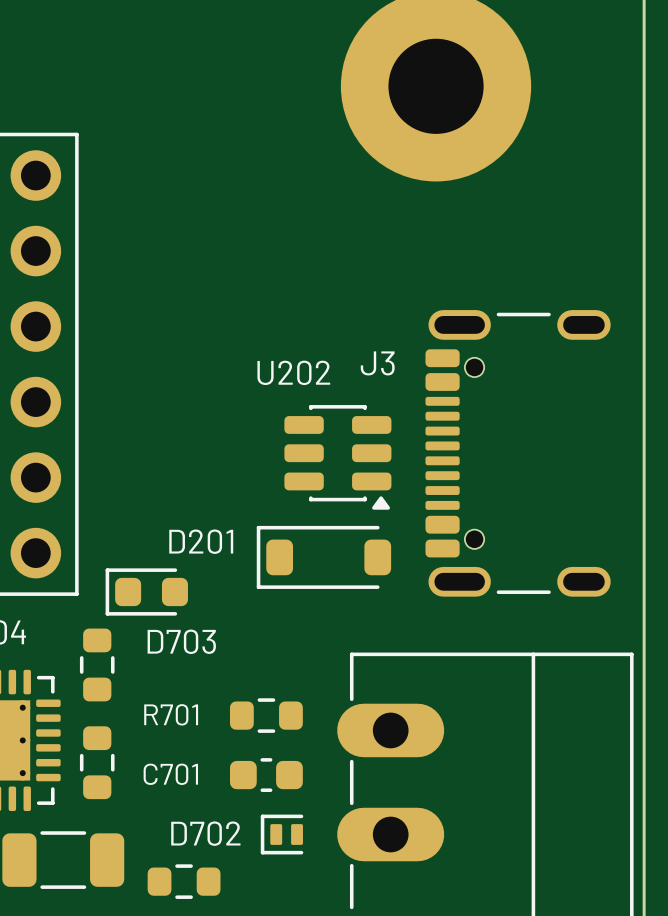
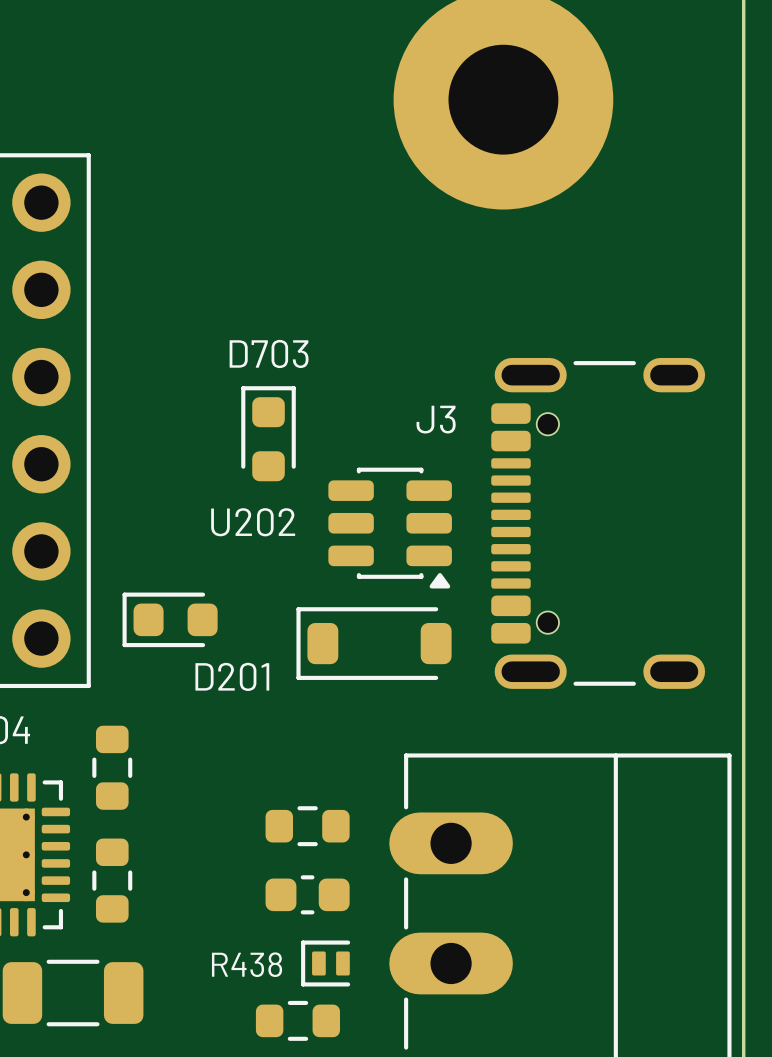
U202 name position: U202 (293, 372) -> U202 (253, 522)
part: none -> (170, 619)
D201 name position: D201 (201, 541) -> D201 (232, 676)
D703 rotation: 0° (146, 591) -> 90° clockwise (268, 433)
D703 position: (146, 591) -> (268, 433)
D703 name position: D703 (181, 641) -> D703 (269, 354)
R701 name: R701 (171, 714) -> none
C701 name: C701 (170, 774) -> none
D702 name: D702 (205, 833) -> none
part: (184, 881) -> none
R438: none -> (297, 1020)

